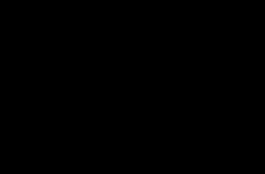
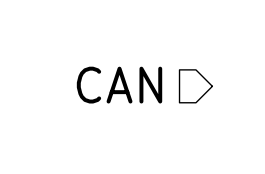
hierarchical label: none -> CAN (119, 85)

